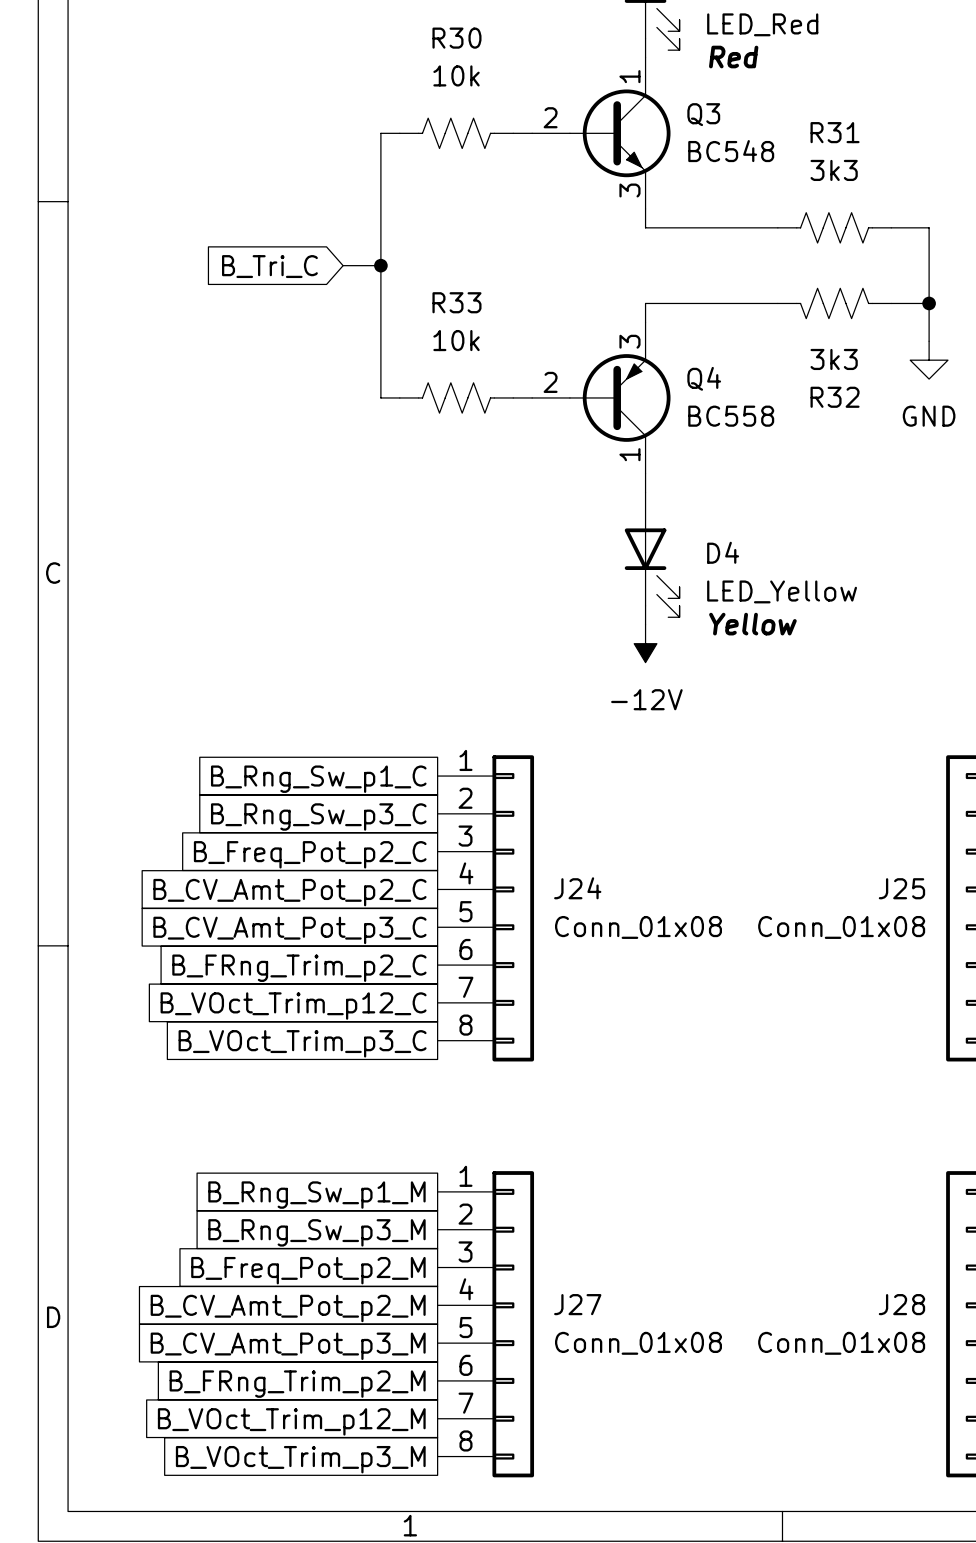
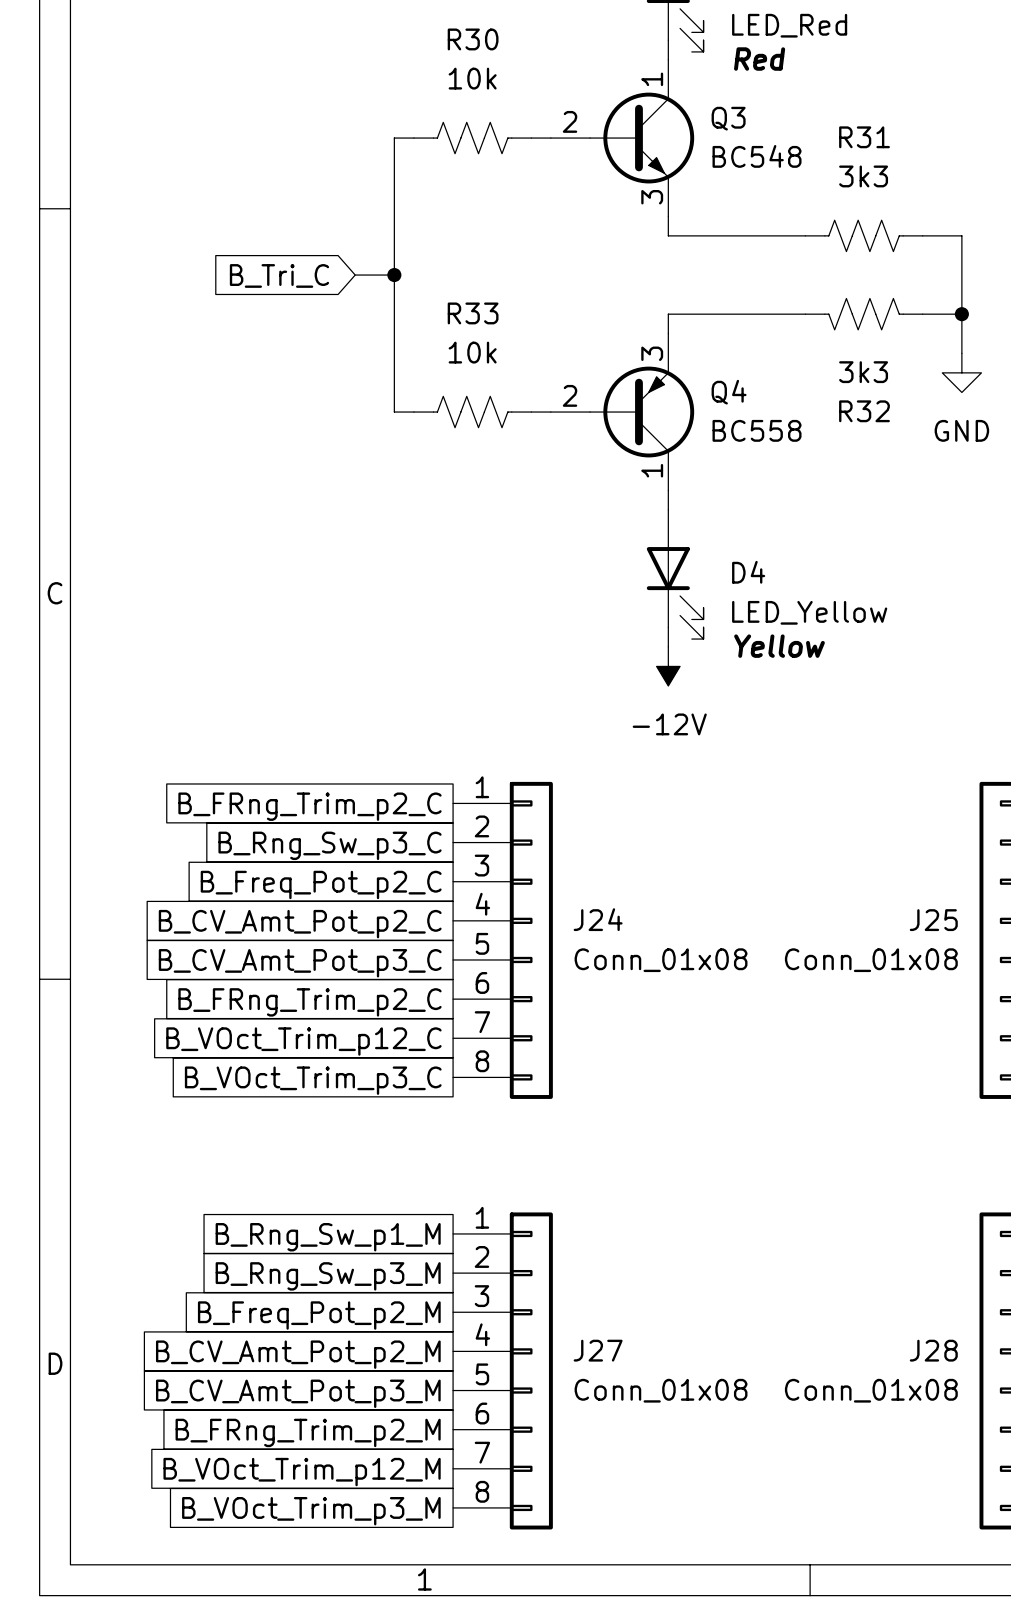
global label: B_Rng_Sw_p1_C (318, 779) -> B_FRng_Trim_p2_C (309, 806)

